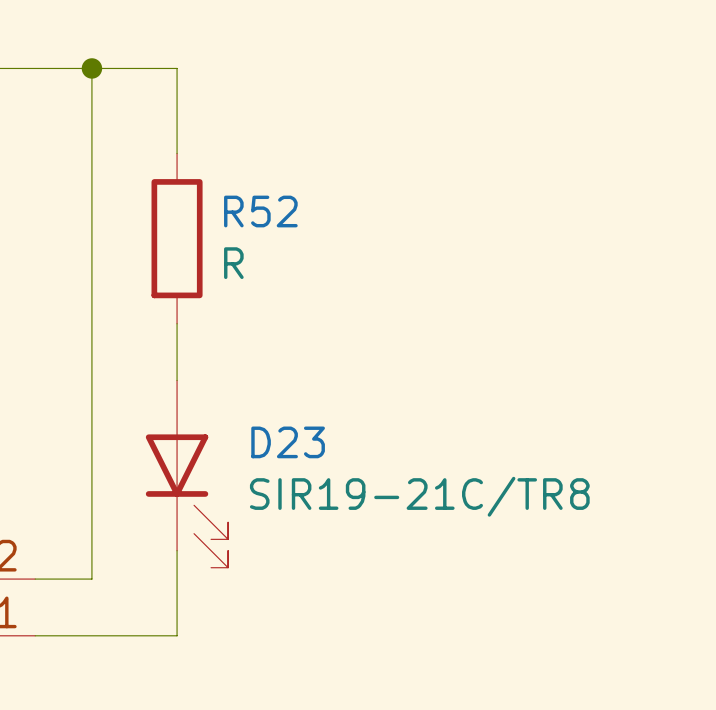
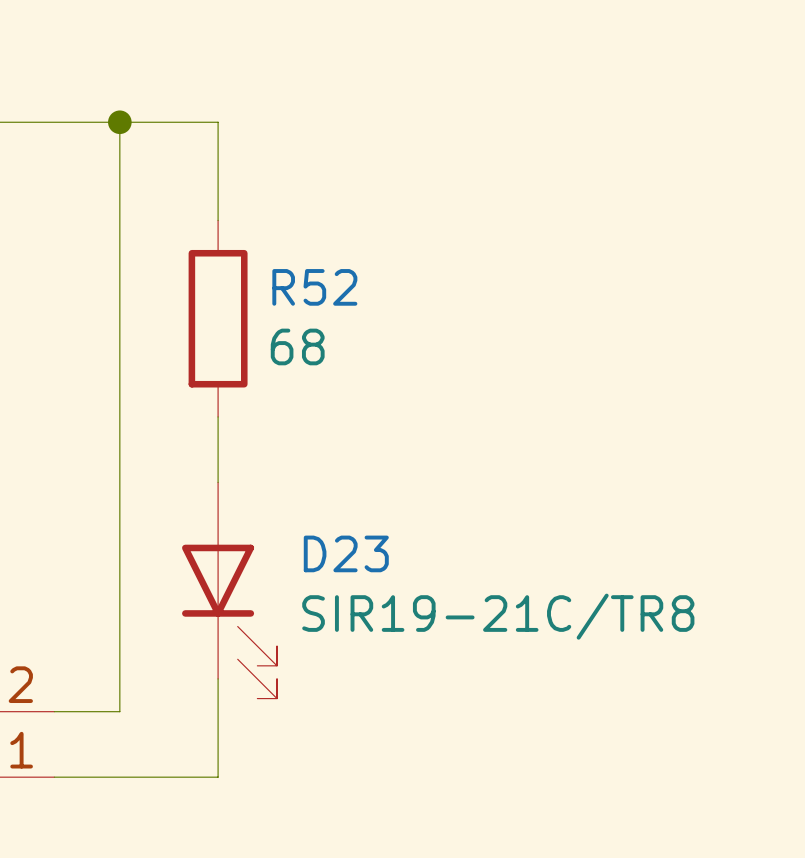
R52 value: R (233, 263) -> 68 (297, 346)

